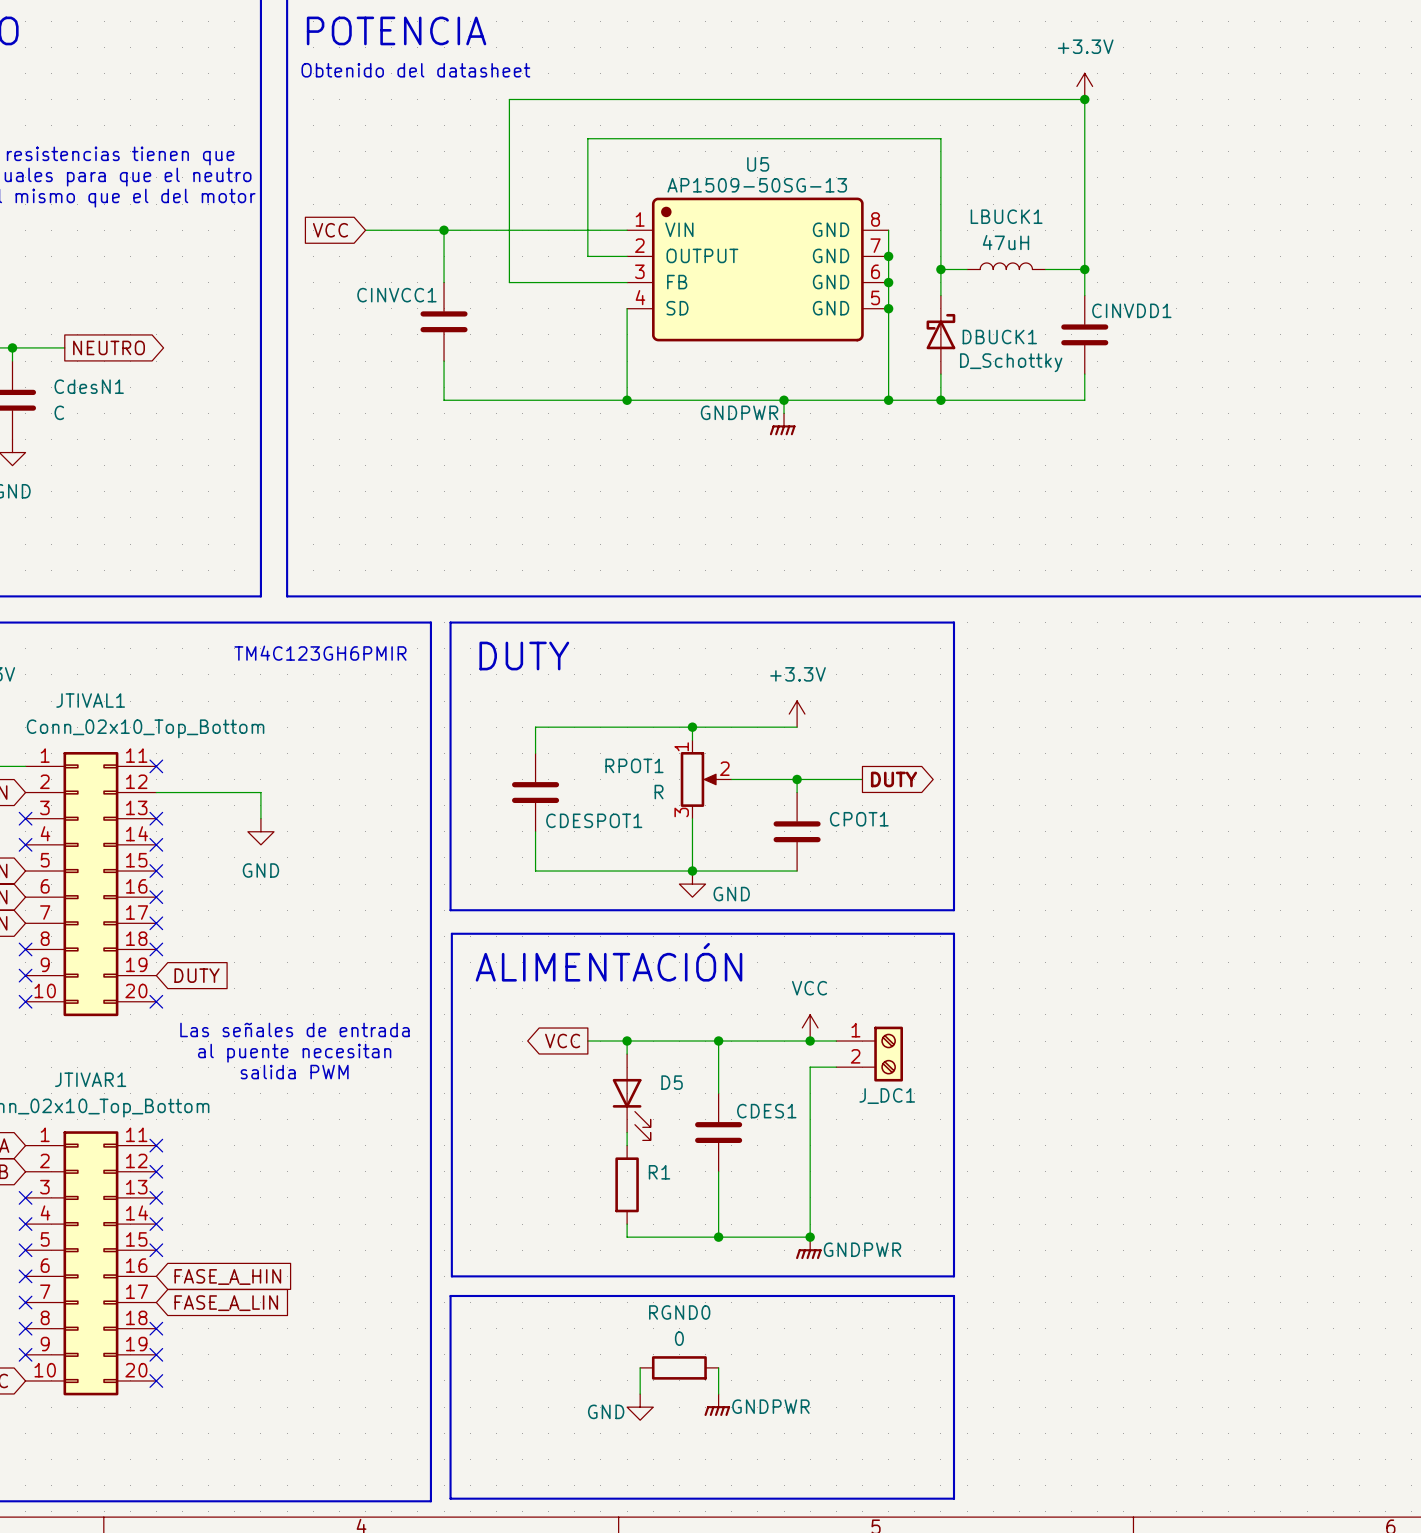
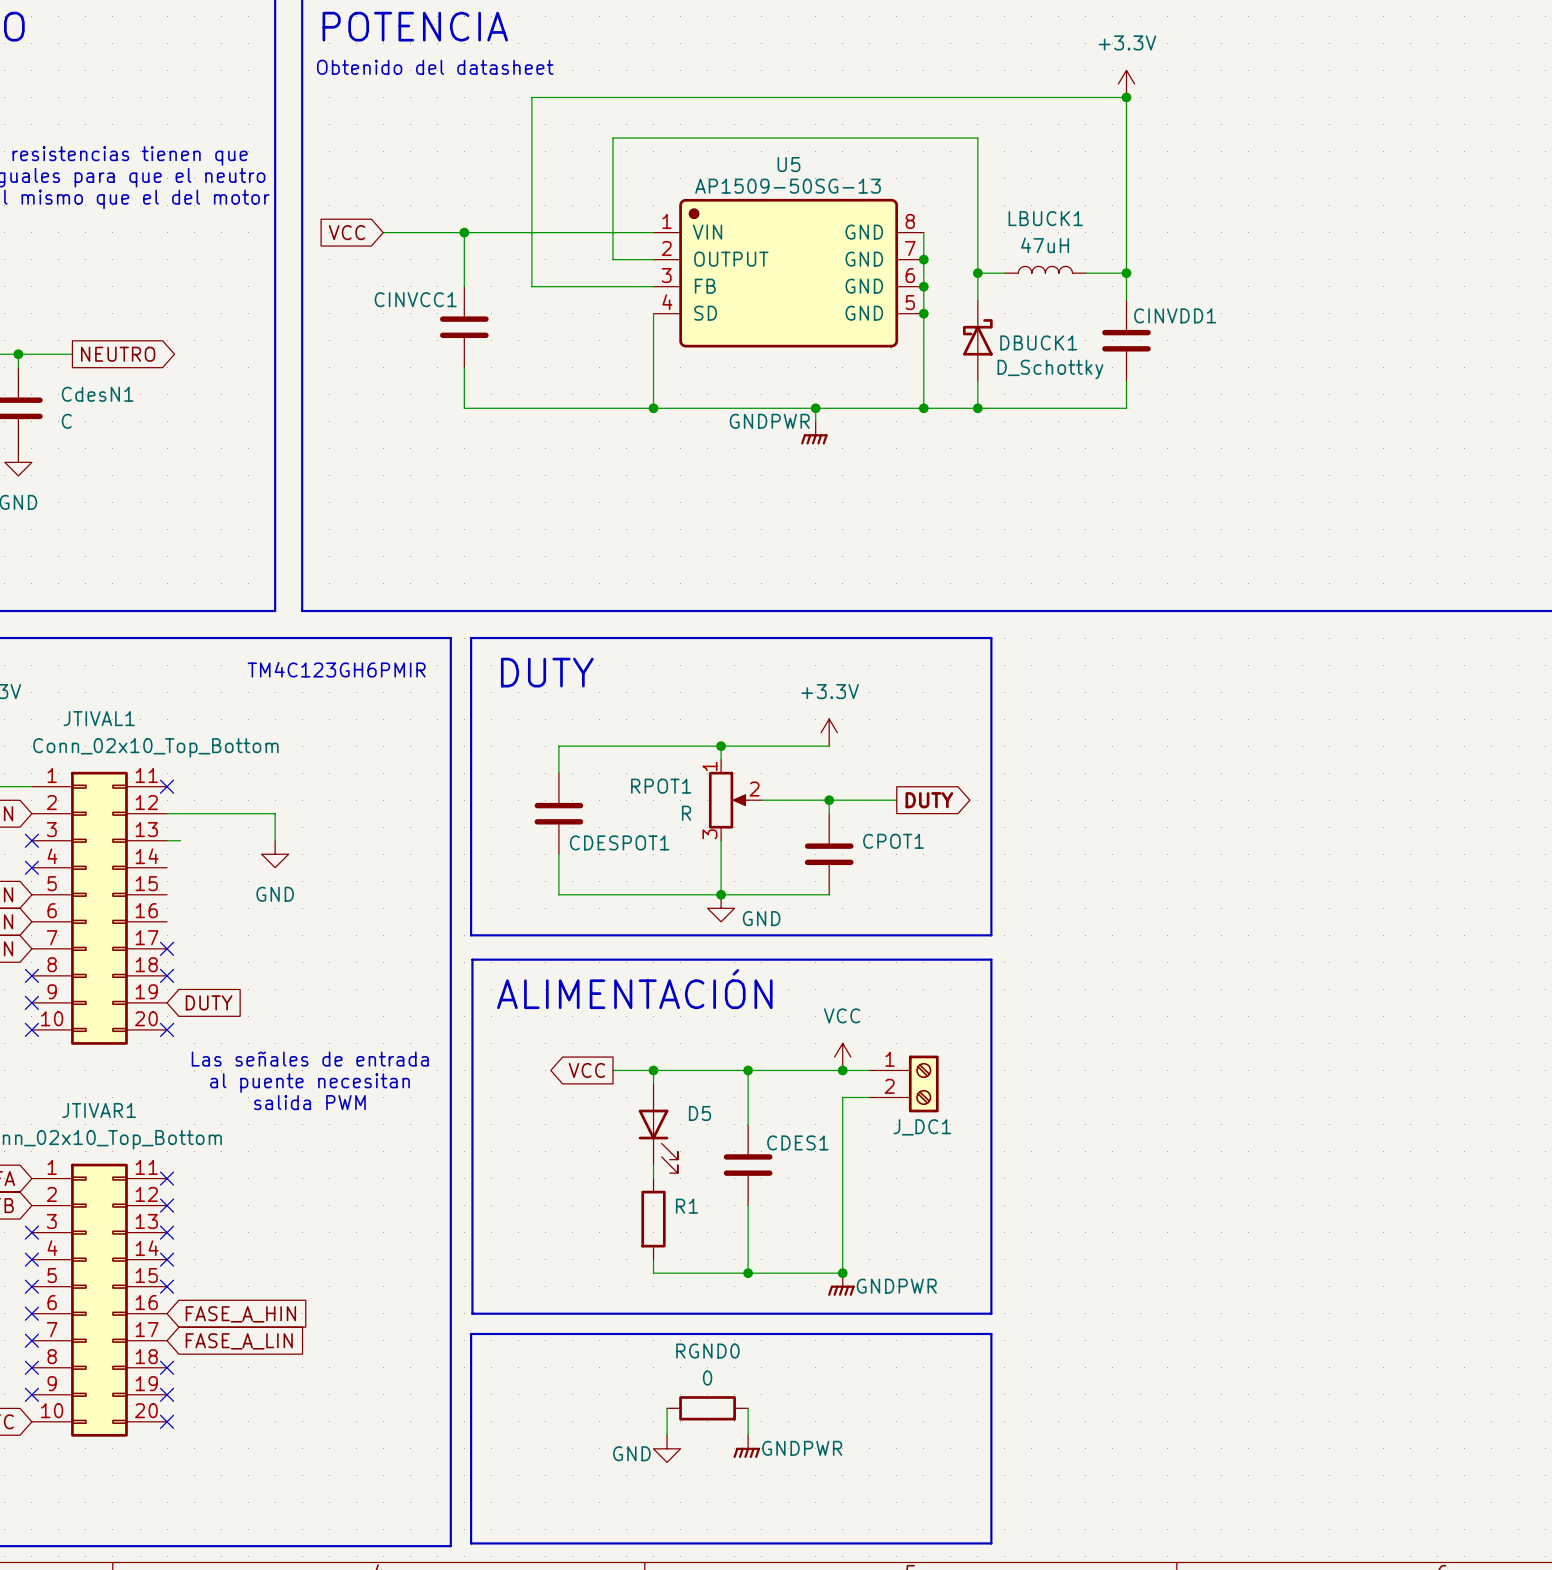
wire: none -> (167, 840) (180, 840)
no-connect mark: (156, 818) -> none
no-connect mark: (156, 844) -> none
no-connect mark: (156, 871) -> none
no-connect mark: (156, 897) -> none

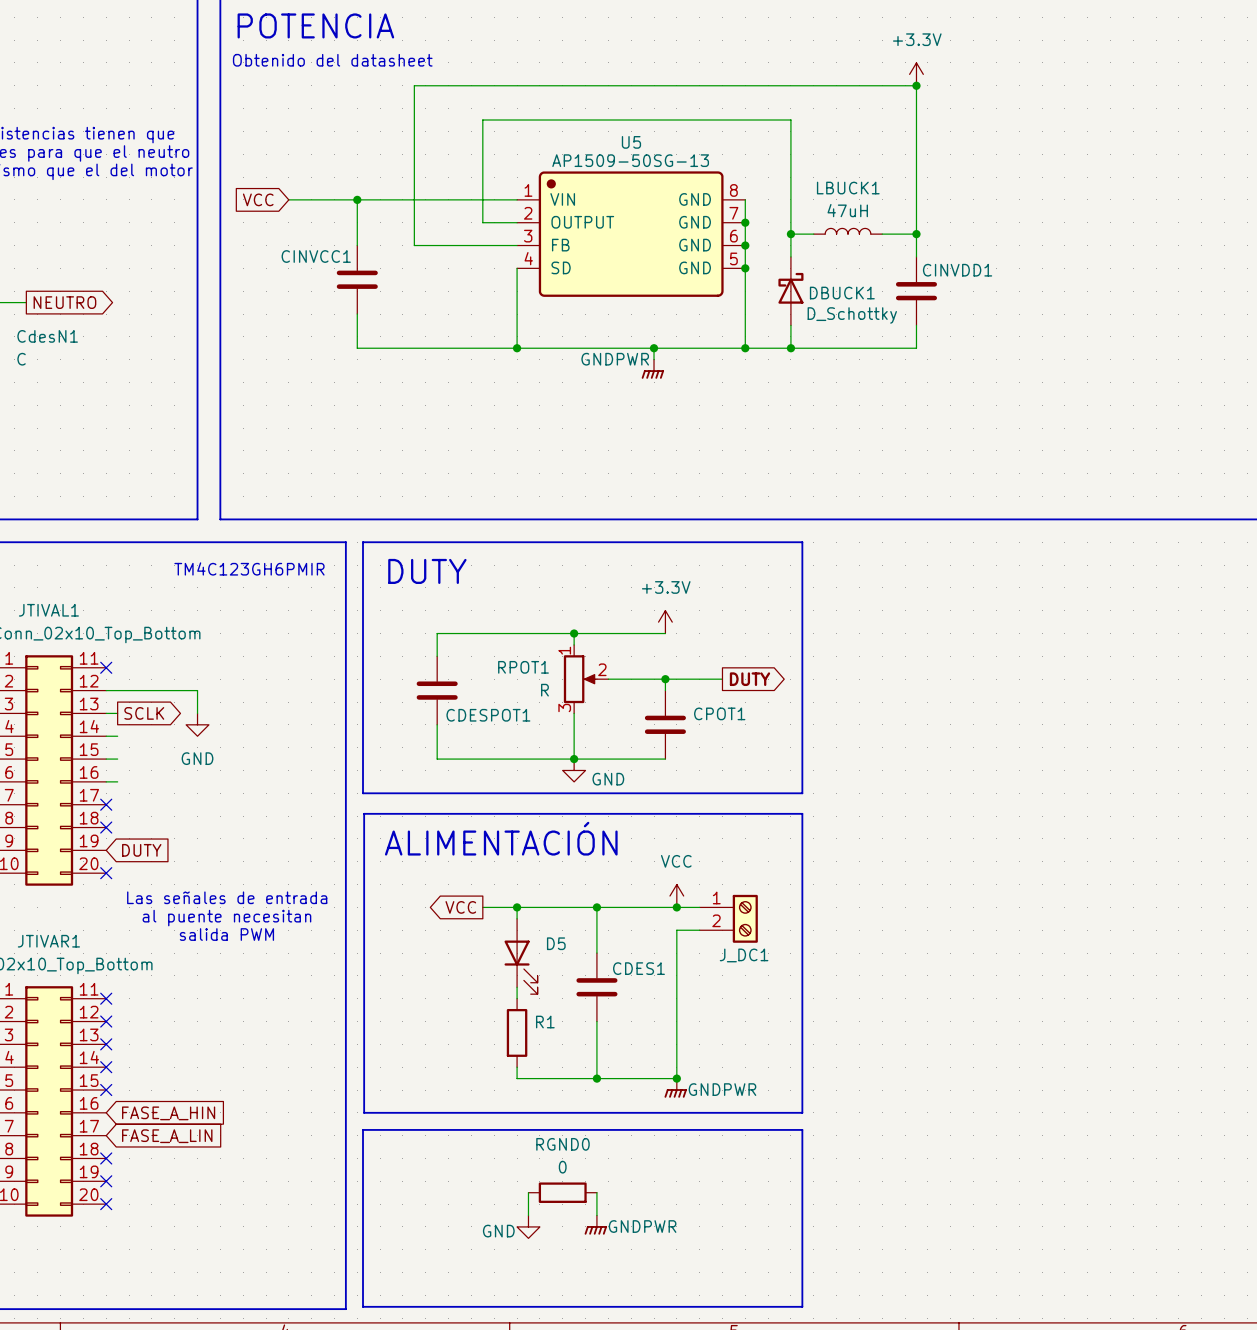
global label: none -> SCLK (144, 713)
wire: none -> (106, 736) (117, 736)
wire: none -> (106, 759) (117, 759)
wire: none -> (106, 781) (117, 781)

